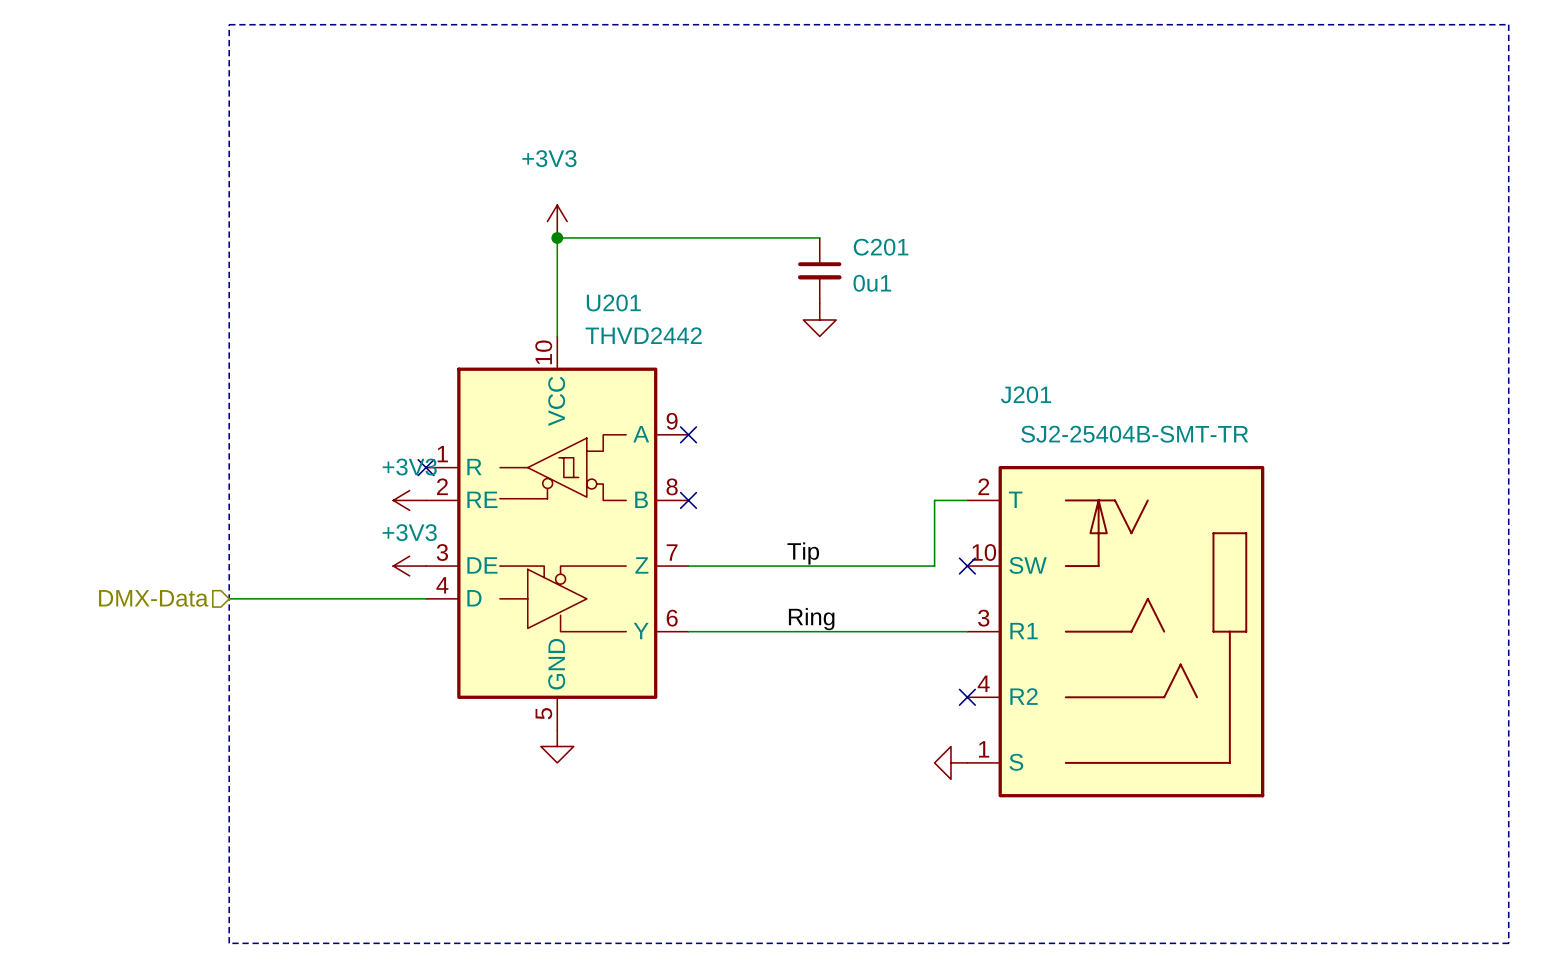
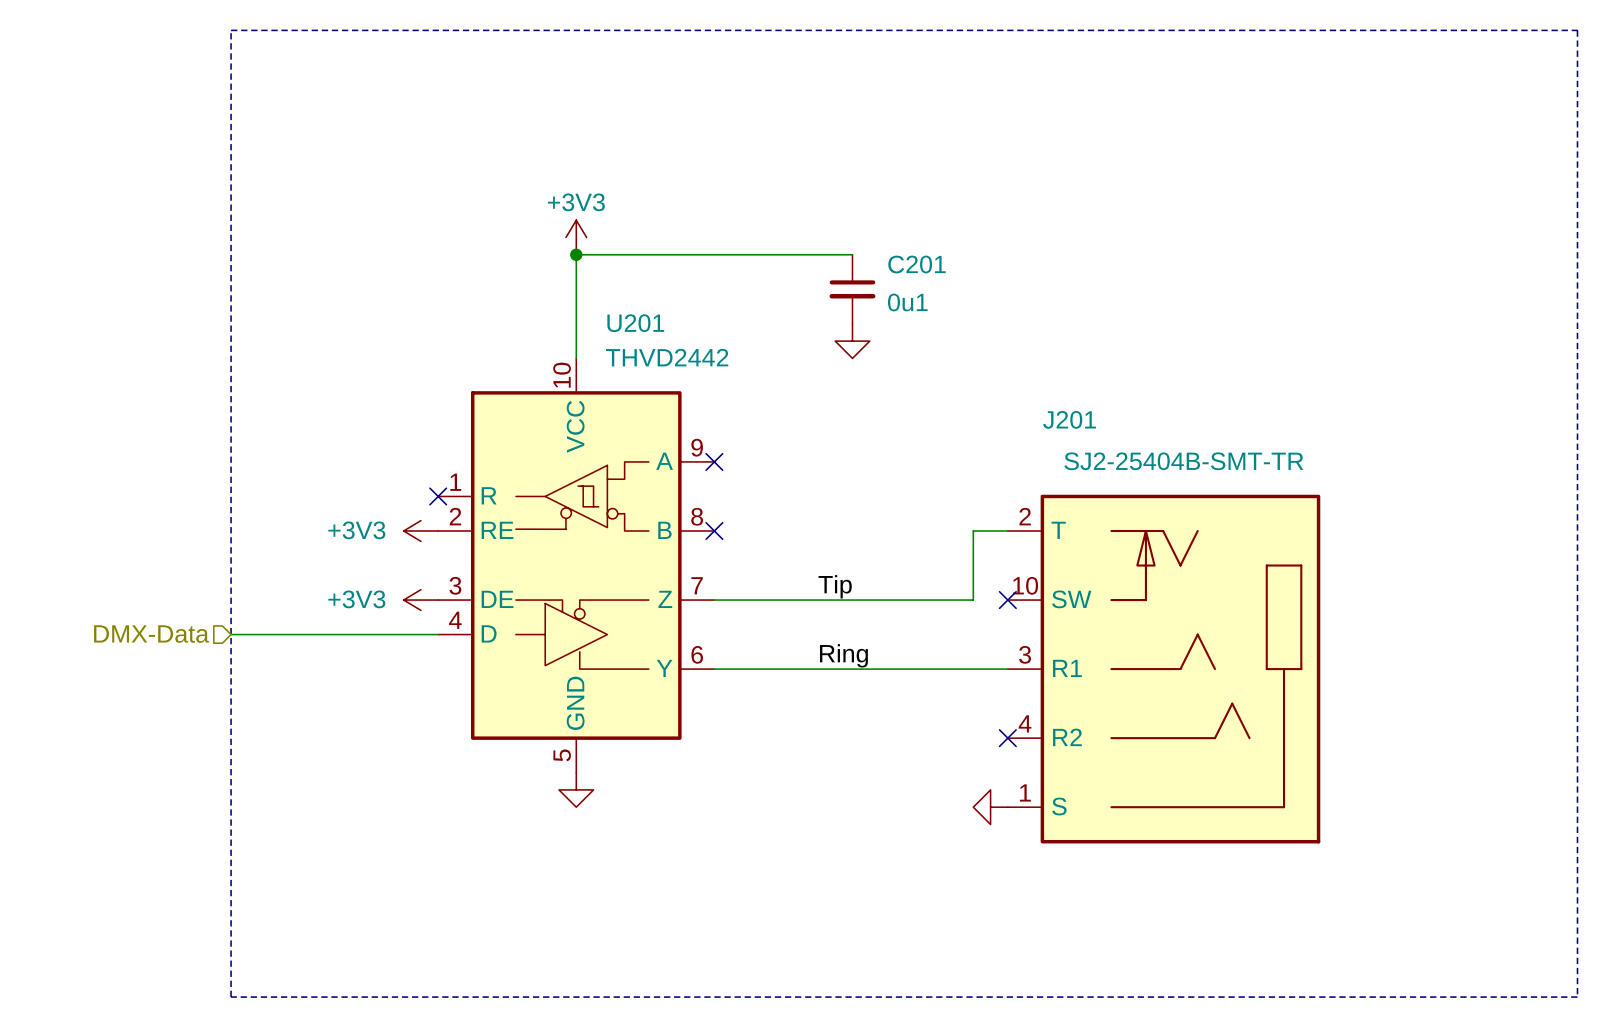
power symbol text position: +3V3 (549, 158) -> +3V3 (576, 202)
power symbol text position: +3V3 (409, 467) -> +3V3 (356, 530)
power symbol text position: +3V3 (409, 532) -> +3V3 (356, 599)

